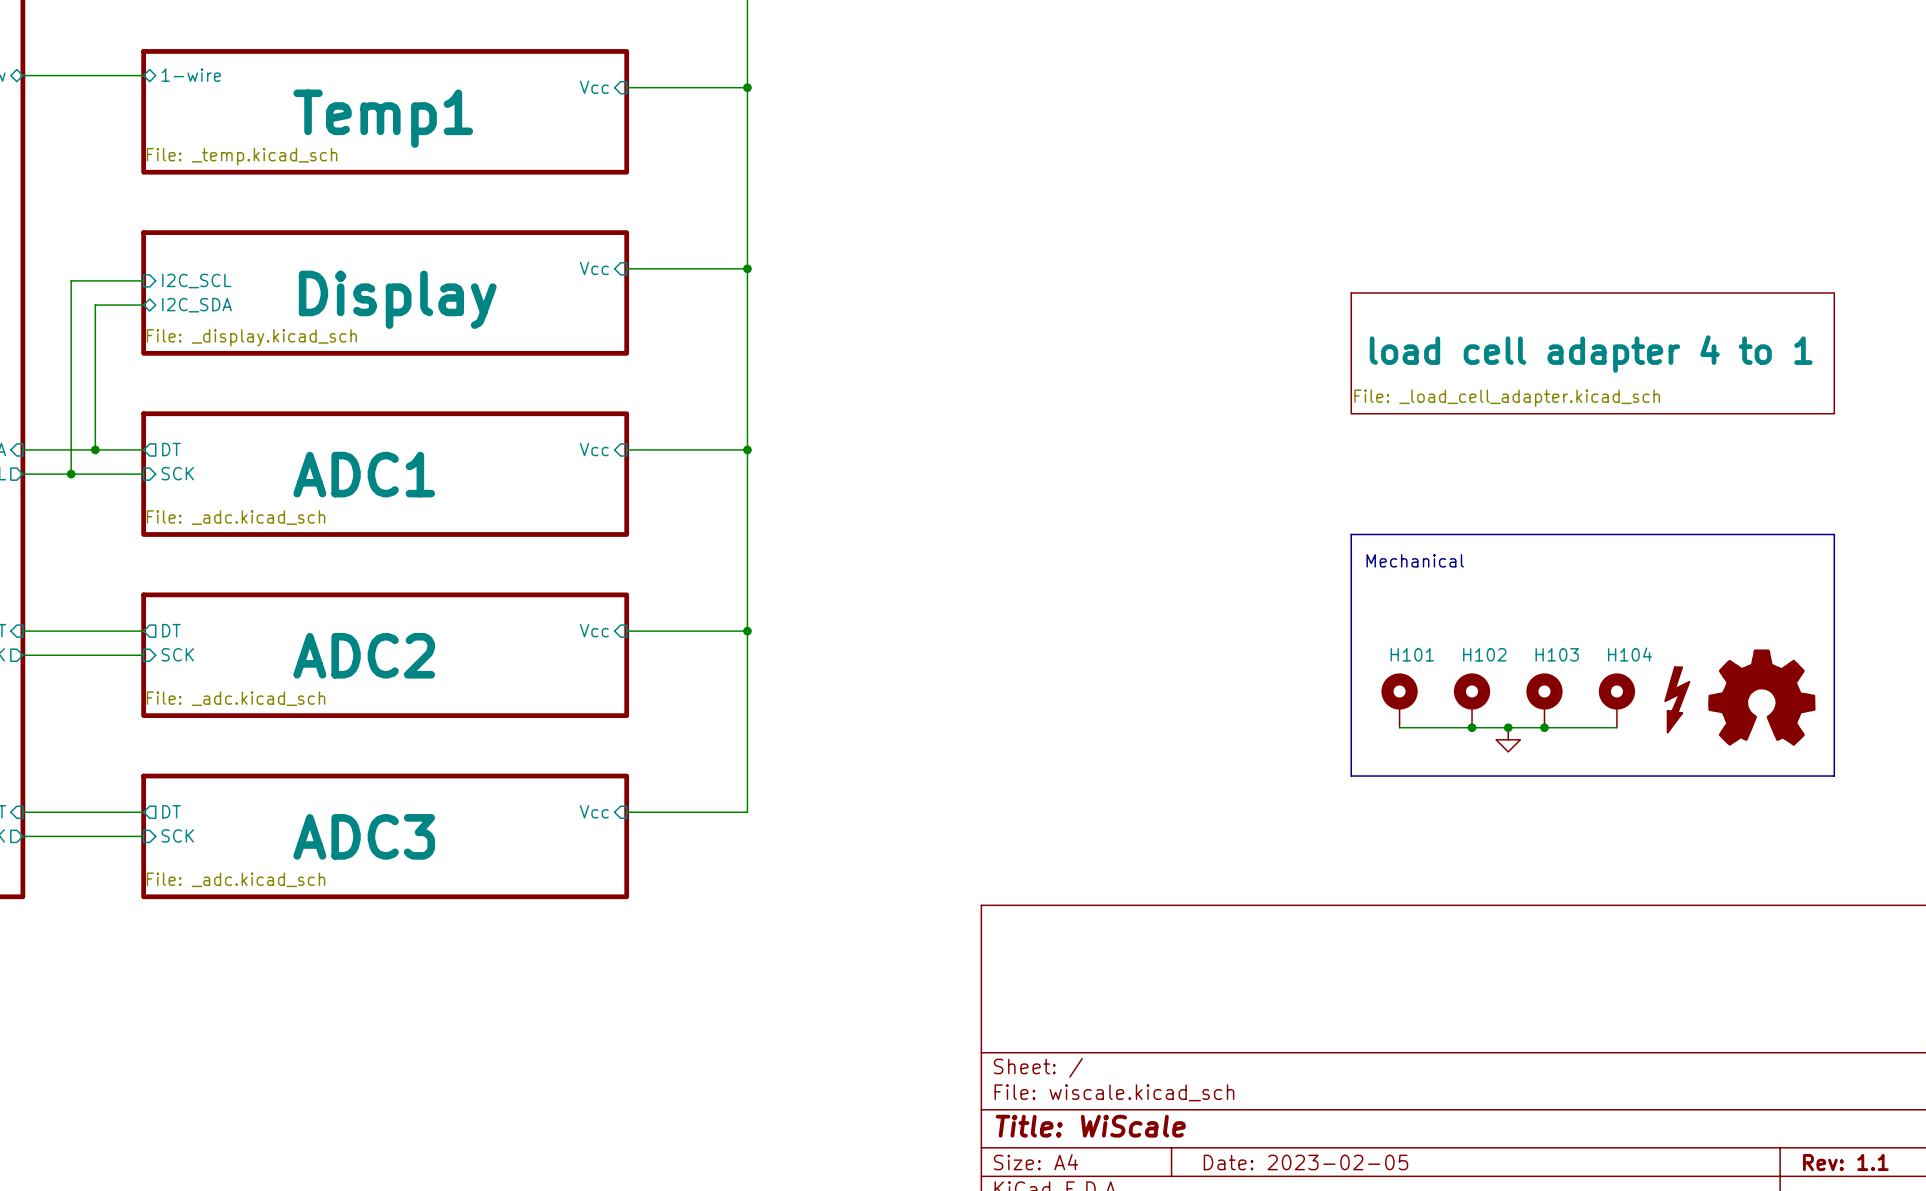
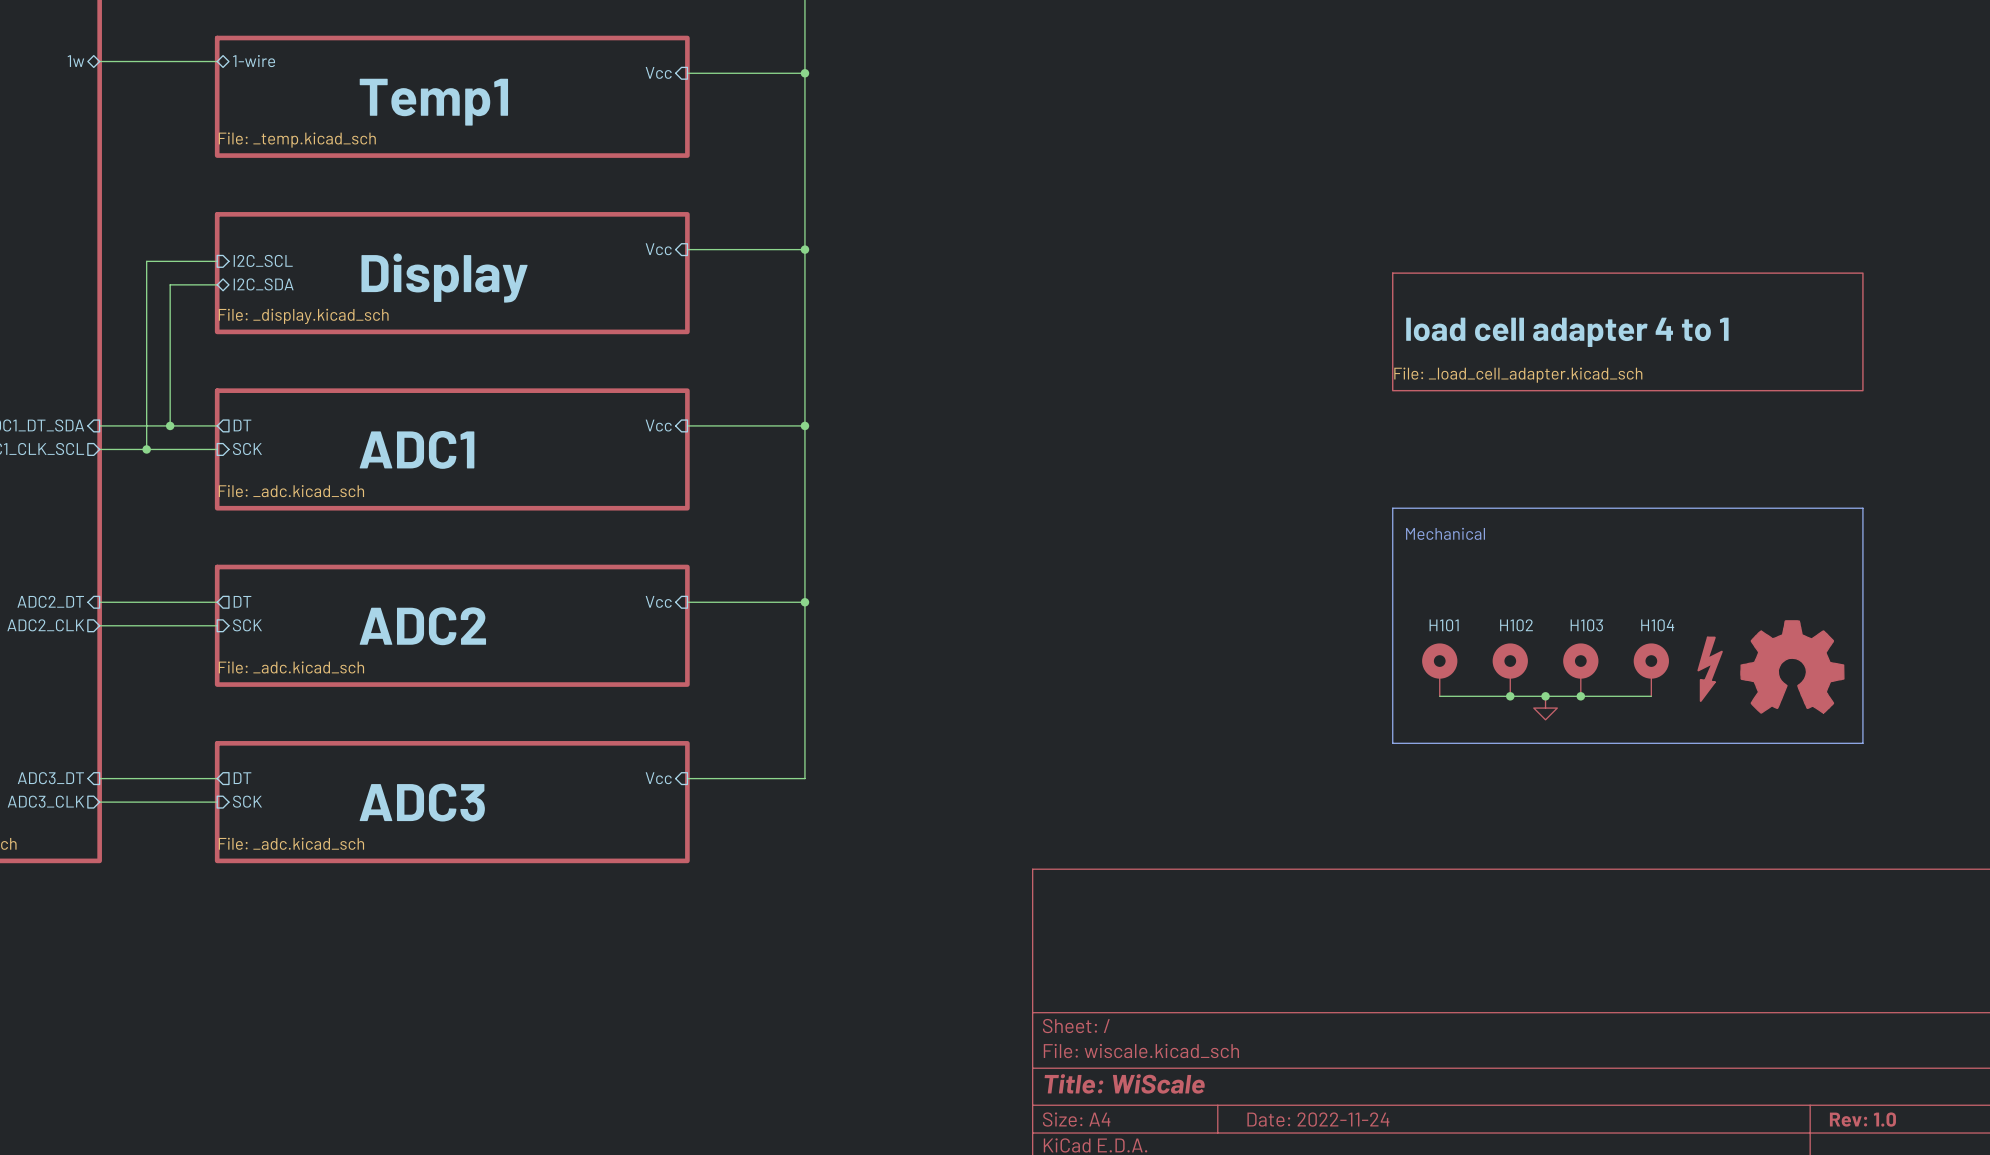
title block: Date: 2023-02-05 (1305, 1162) -> Date: 2022-11-24 (1318, 1119)
title block: Rev: 1.1 (1845, 1162) -> Rev: 1.0 (1862, 1119)

